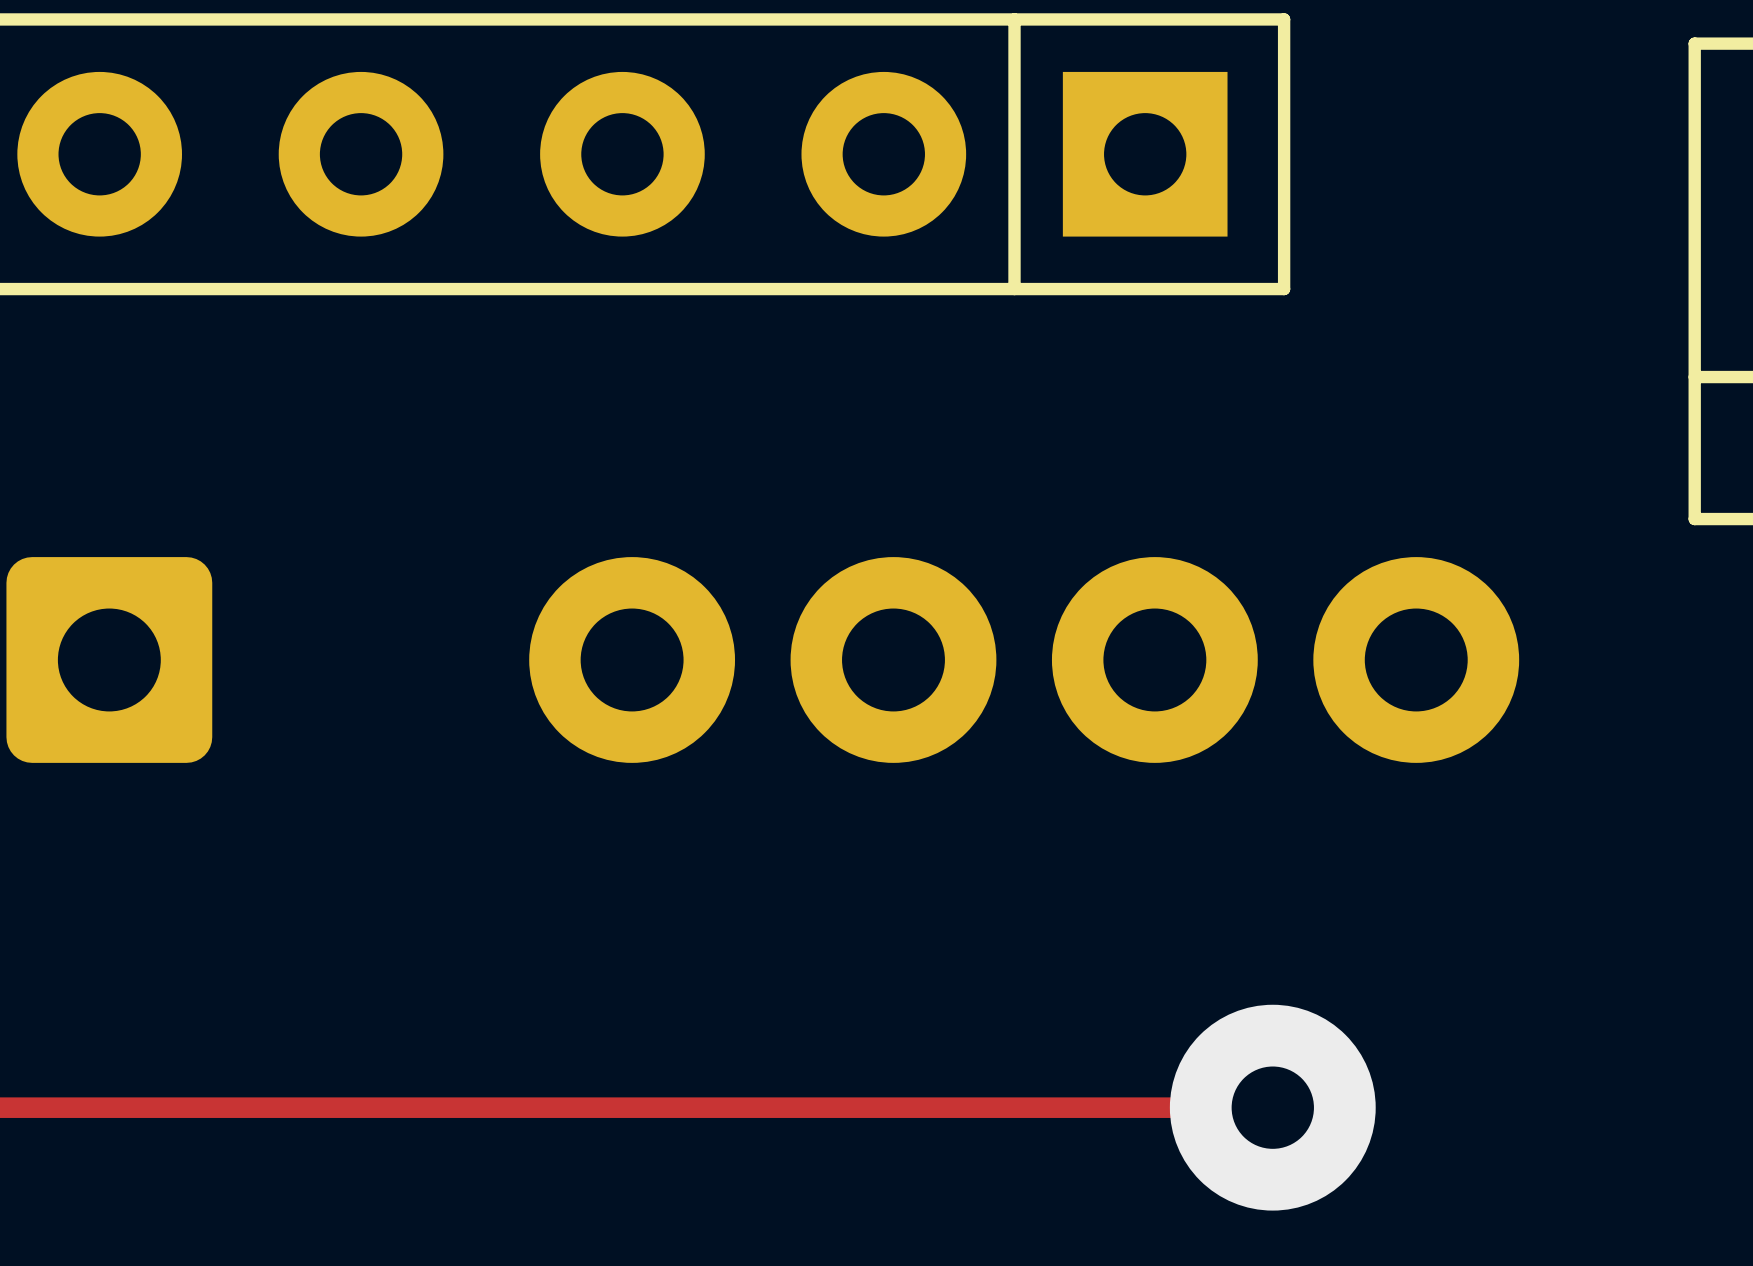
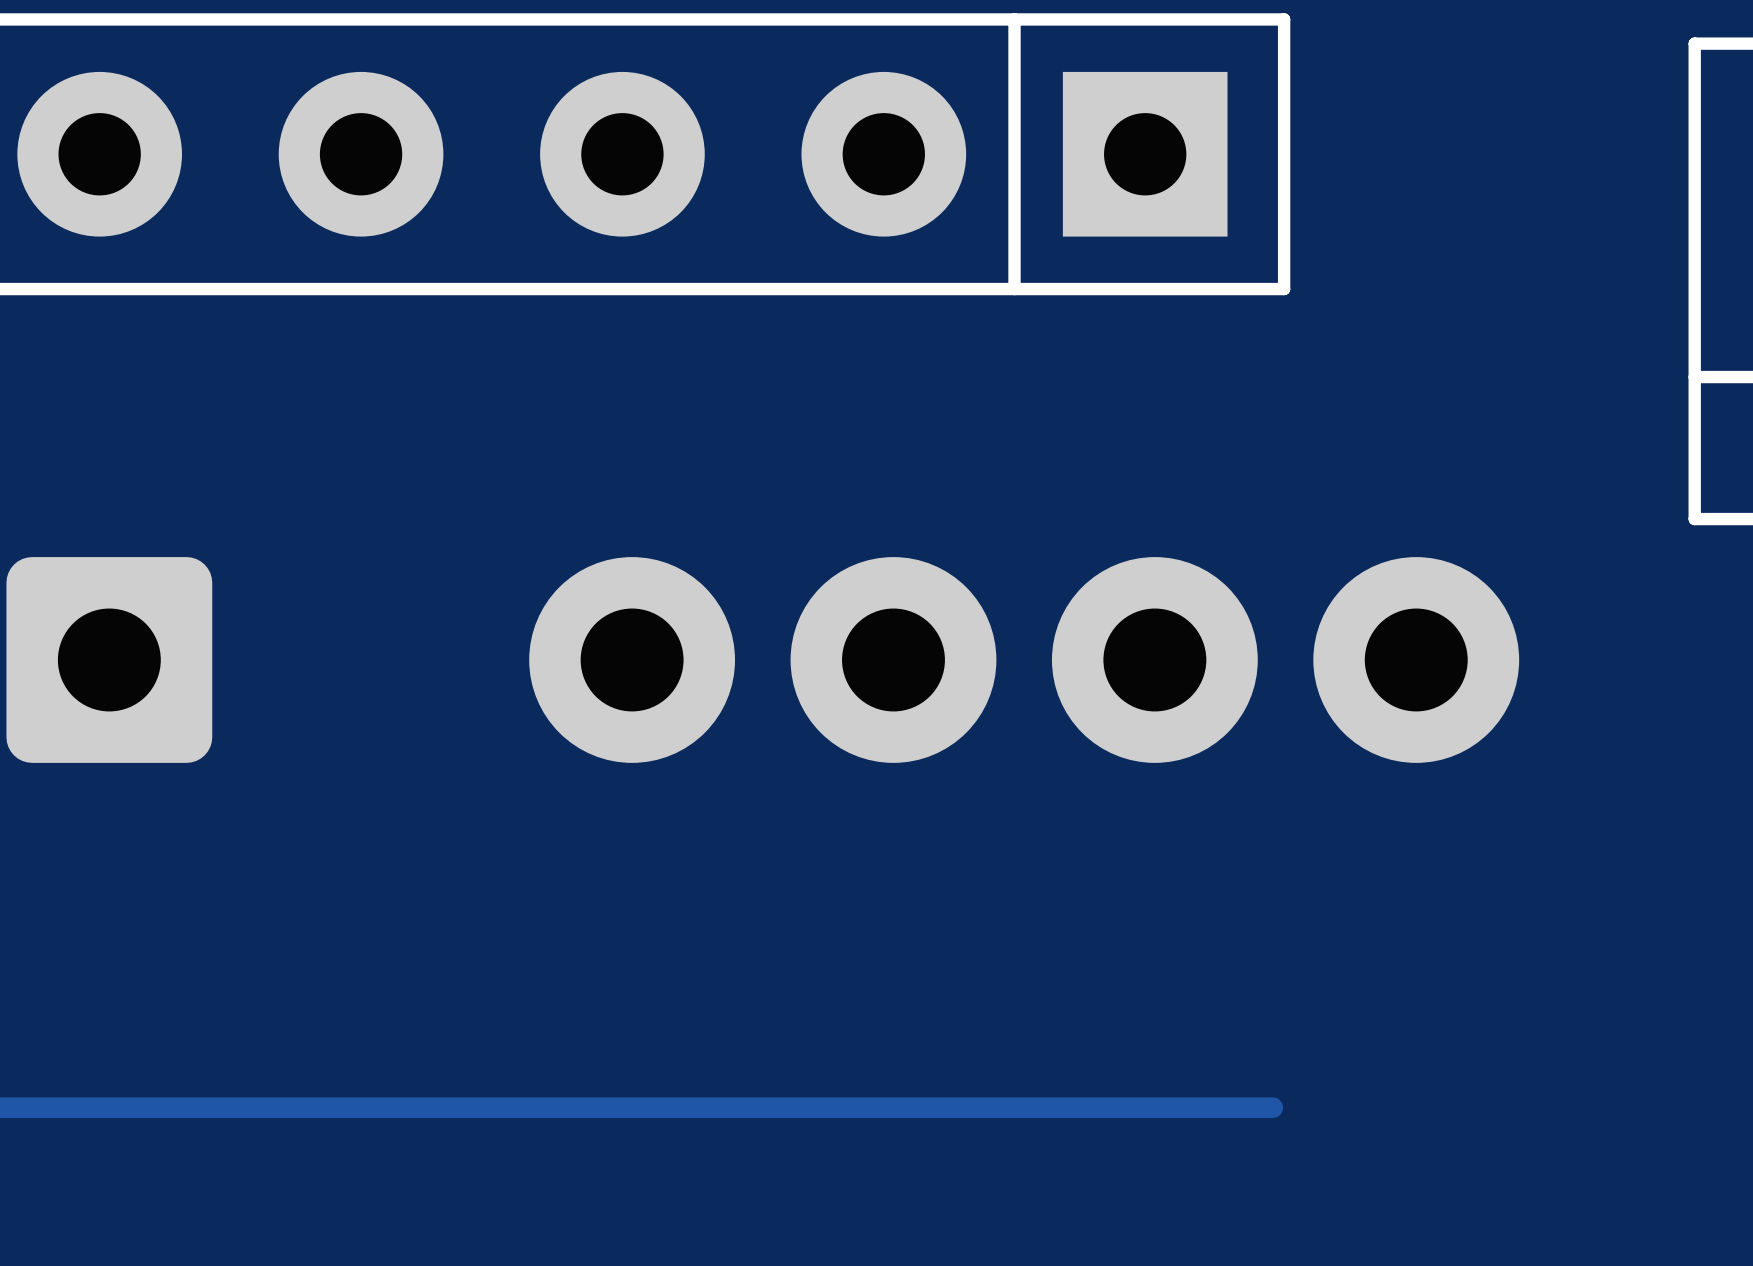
via: (1272, 1107) -> none

